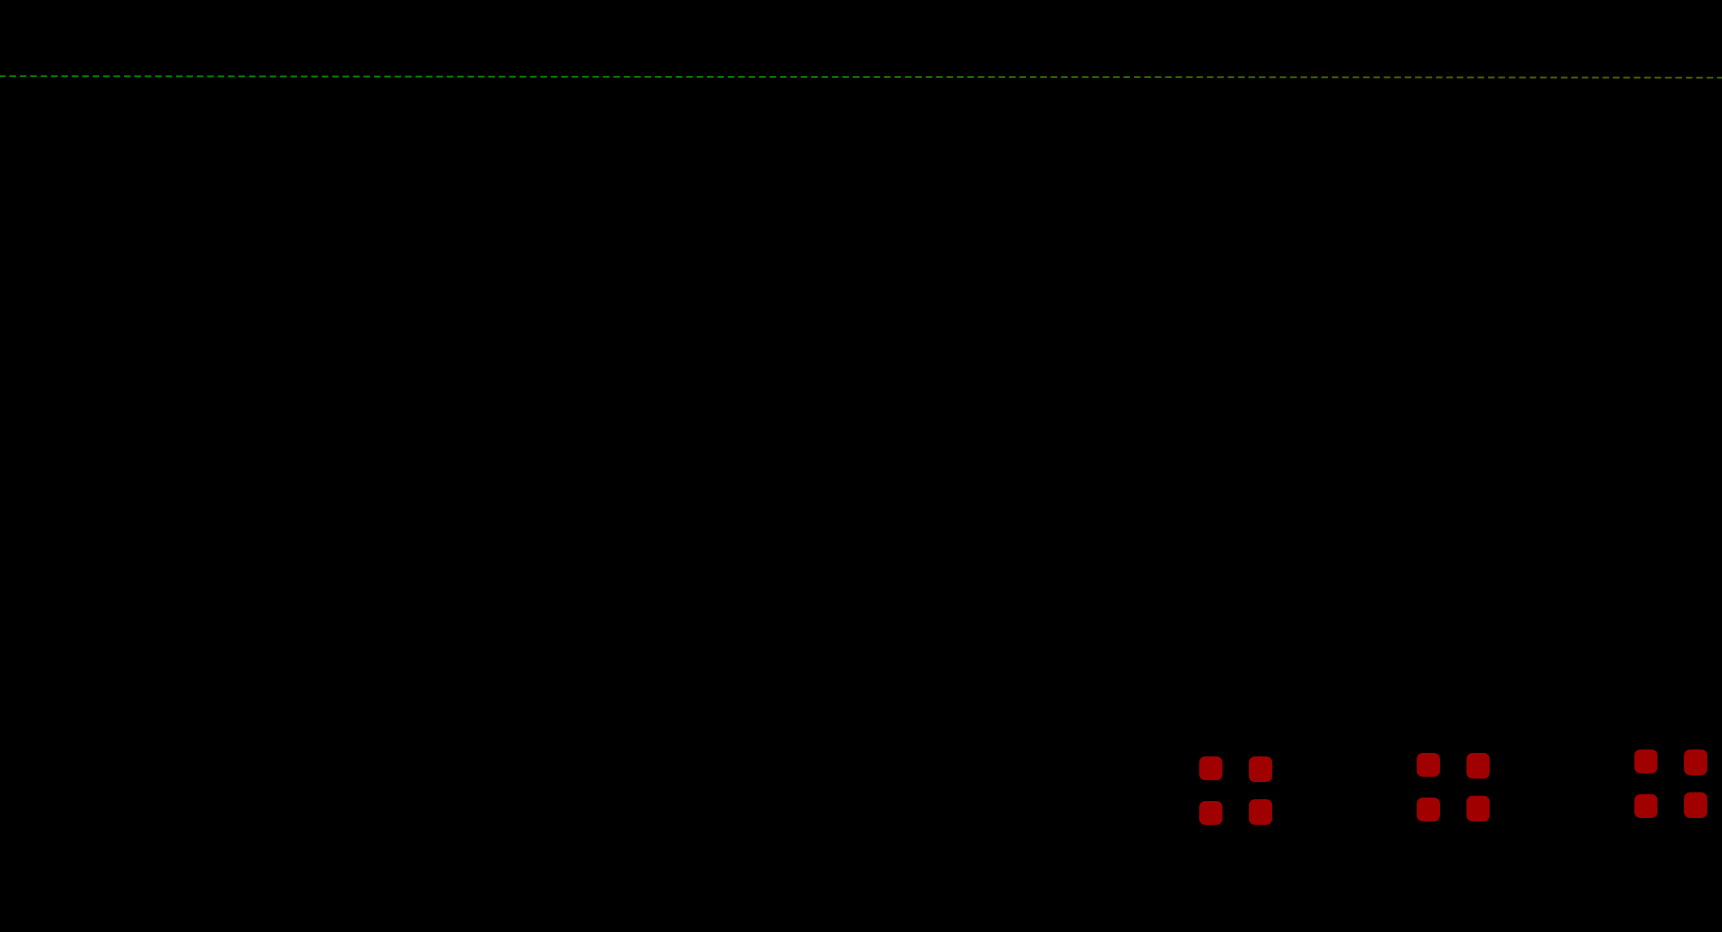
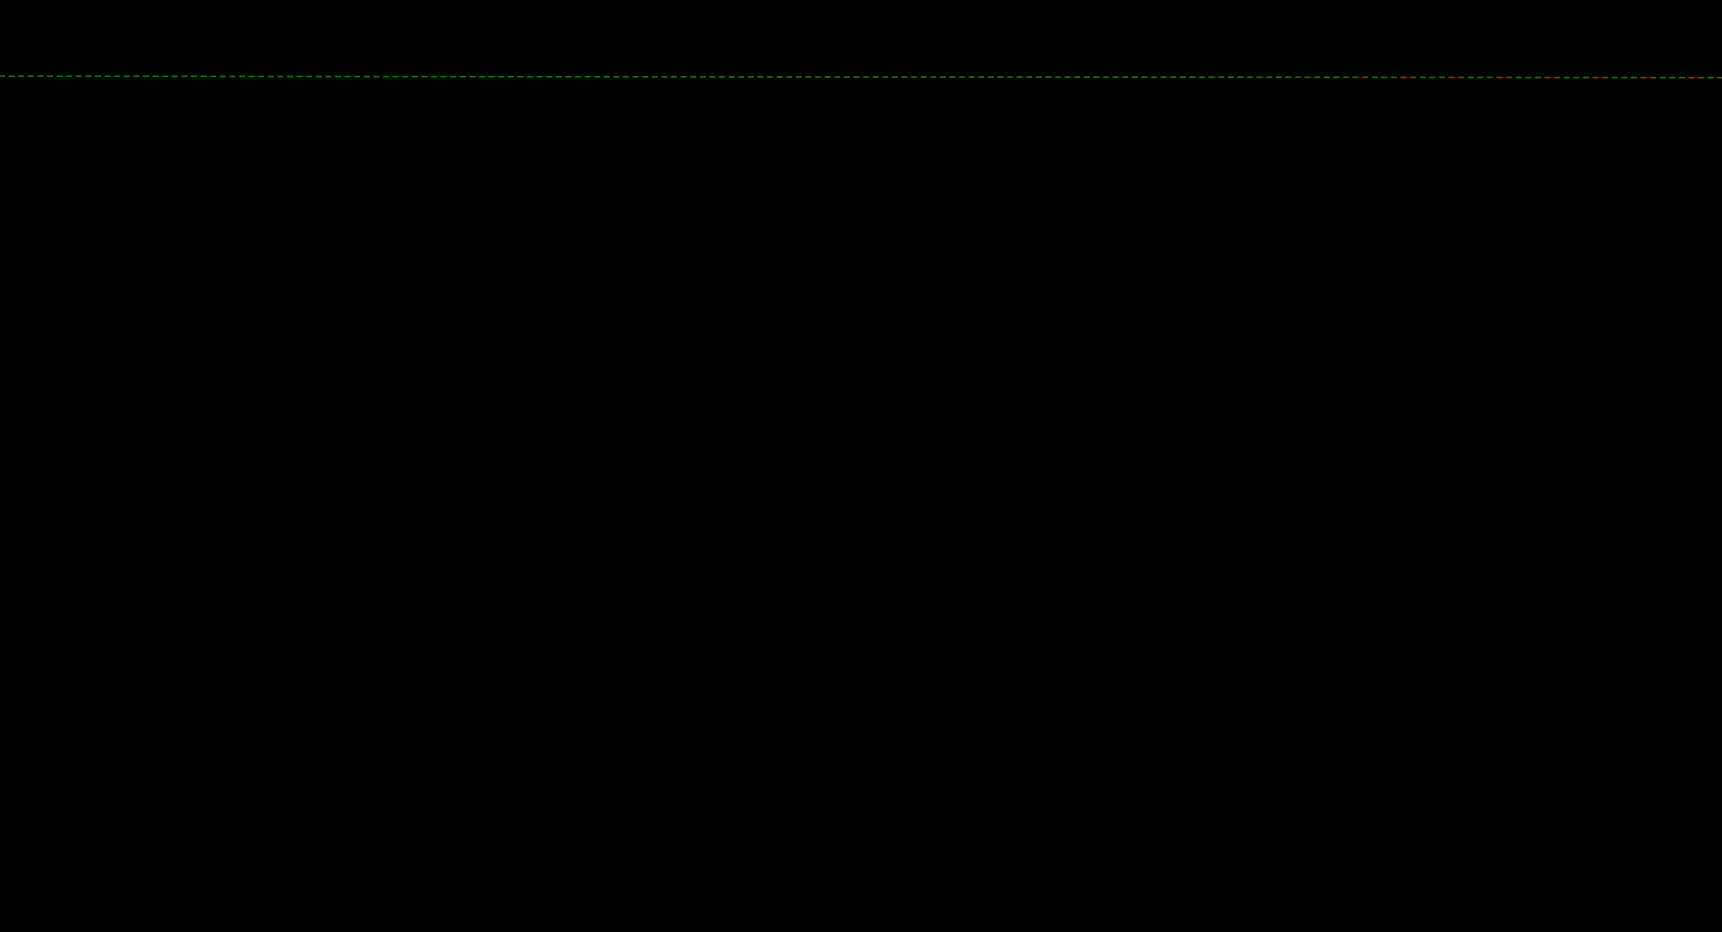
part: (1645, 783) -> none
part: (1695, 783) -> none
part: (1428, 787) -> none
part: (1478, 787) -> none
part: (1210, 790) -> none
part: (1260, 790) -> none

